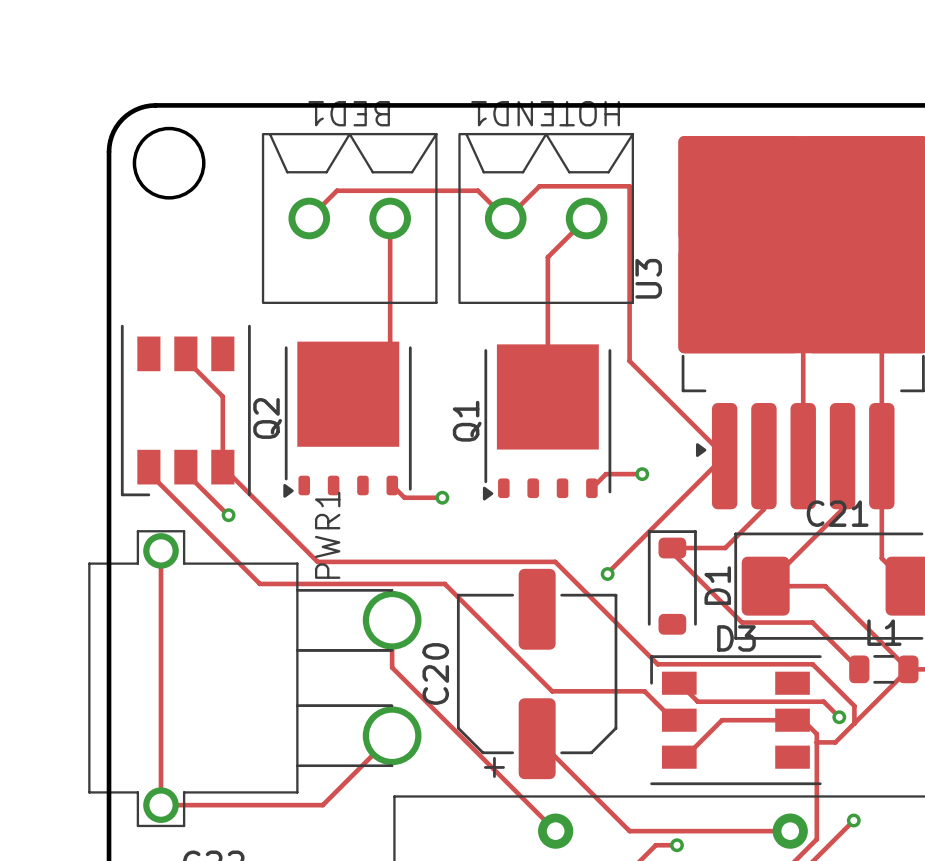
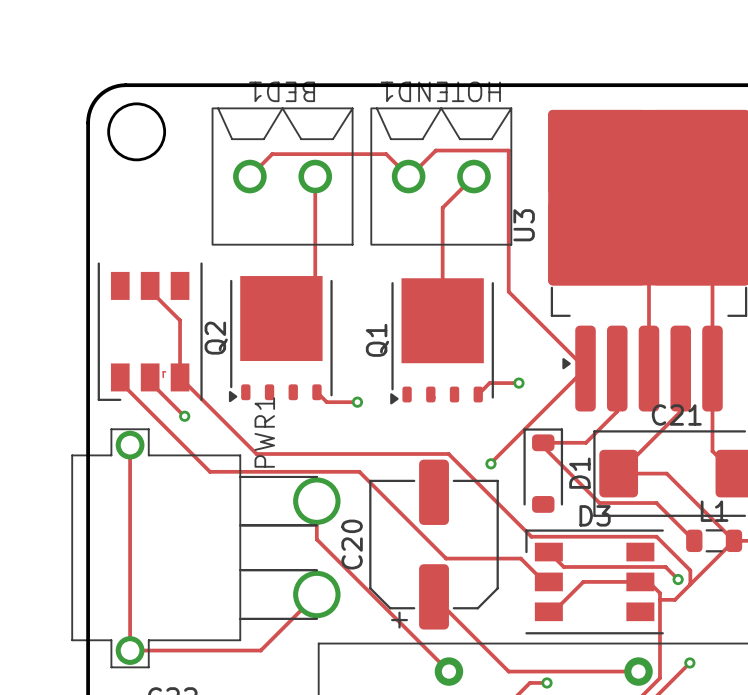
track: none -> (165, 371) (163, 371) (163, 377)

